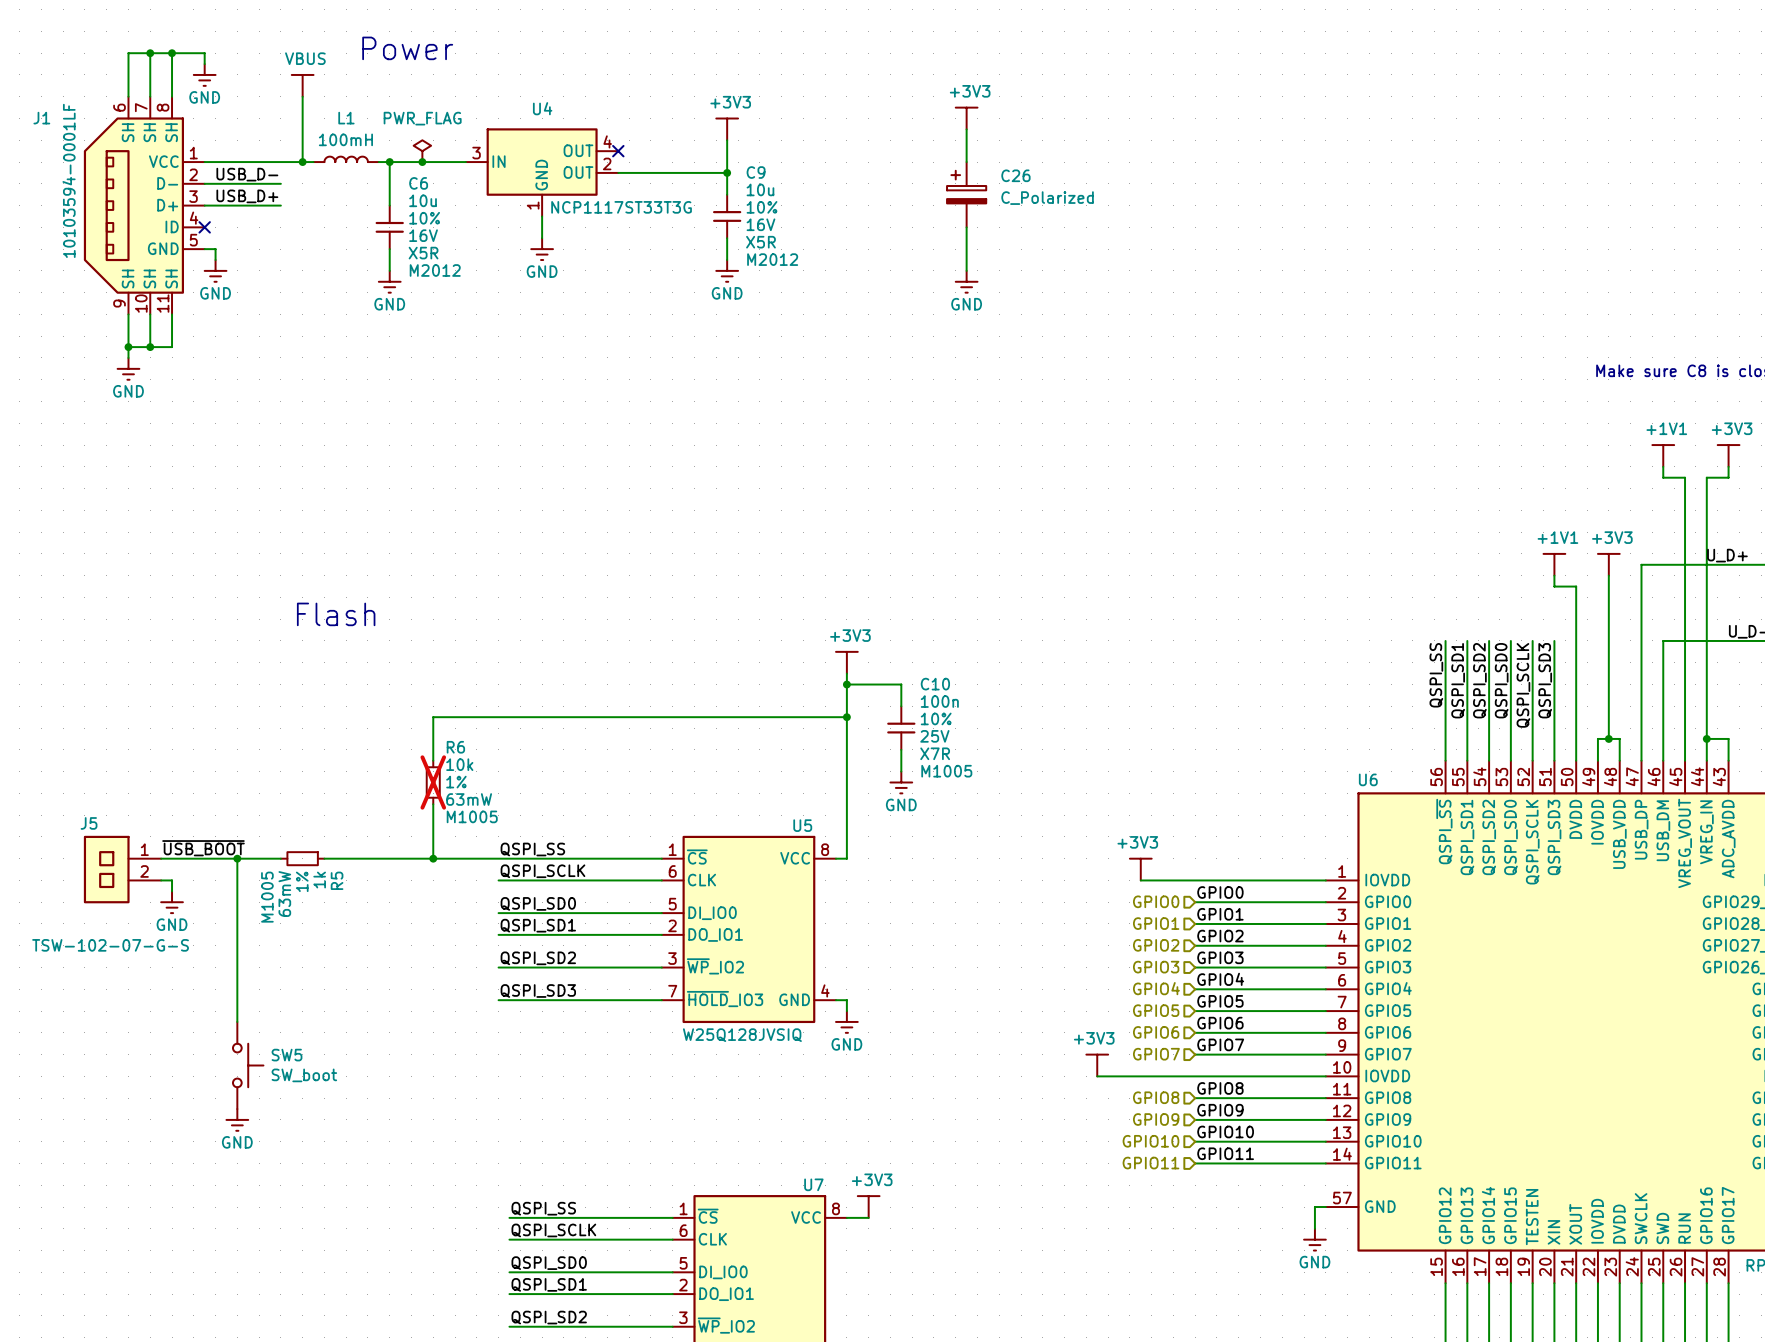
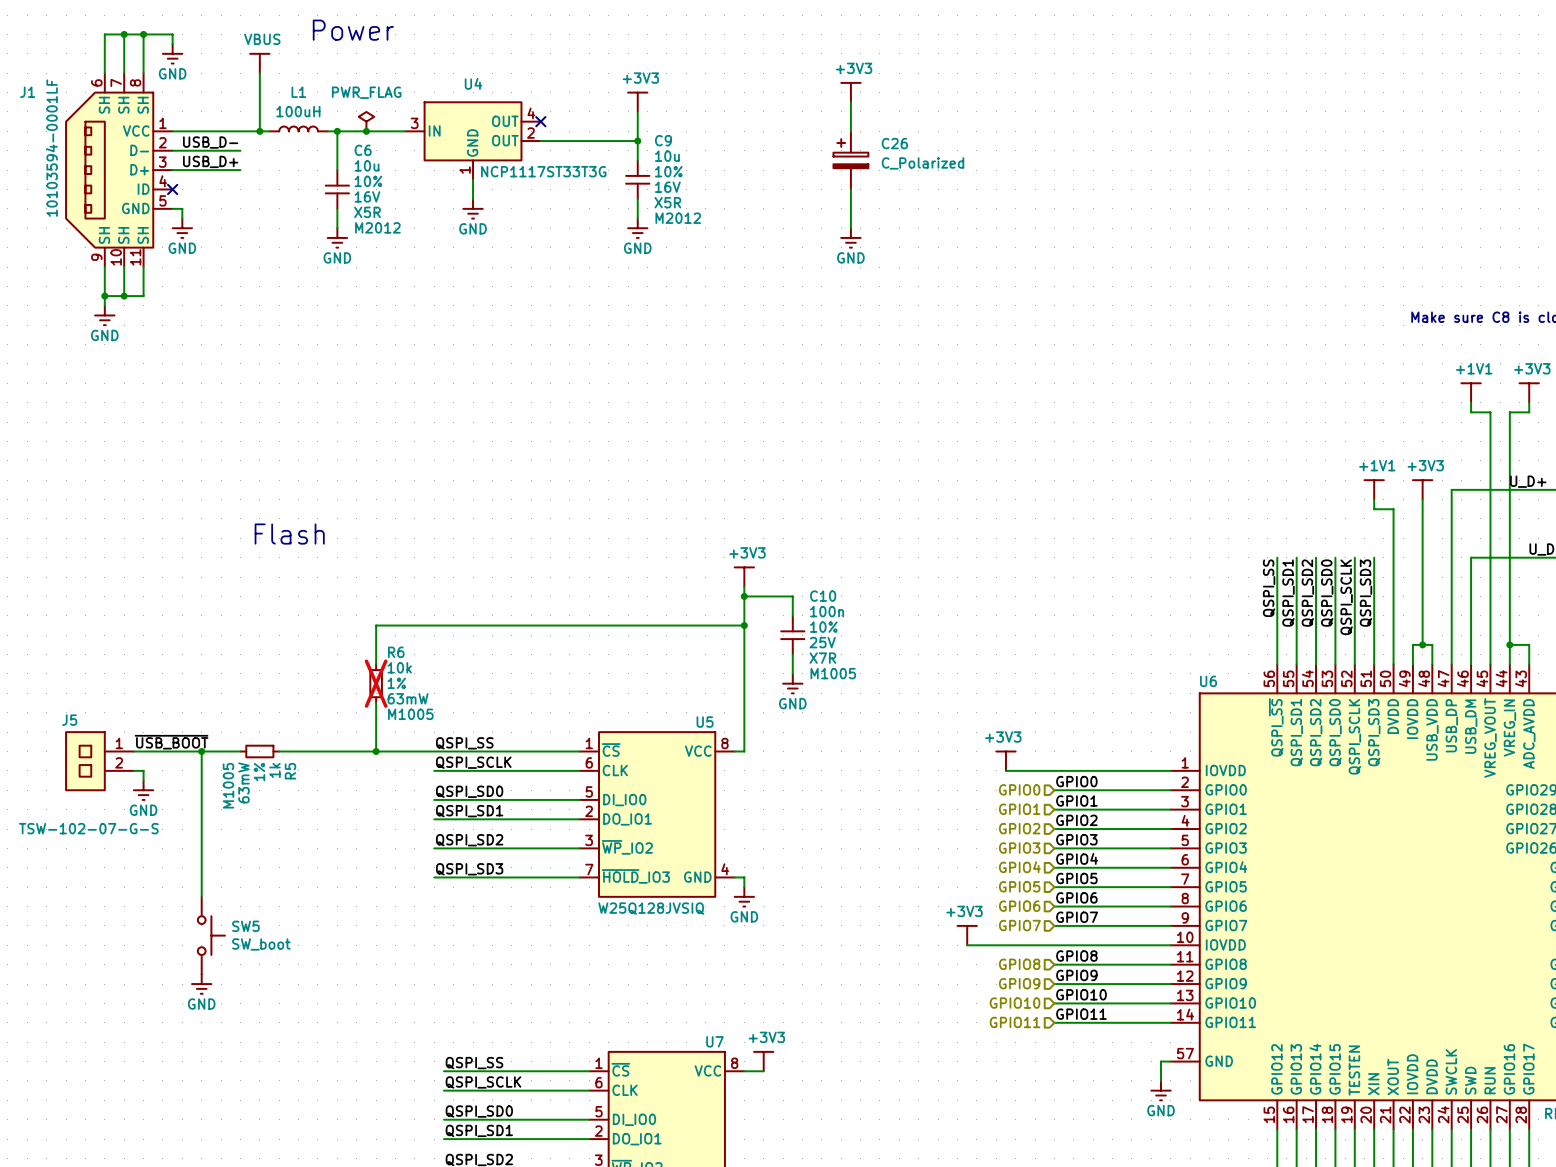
L1 value: 100mH (345, 139) -> 100uH (298, 111)

